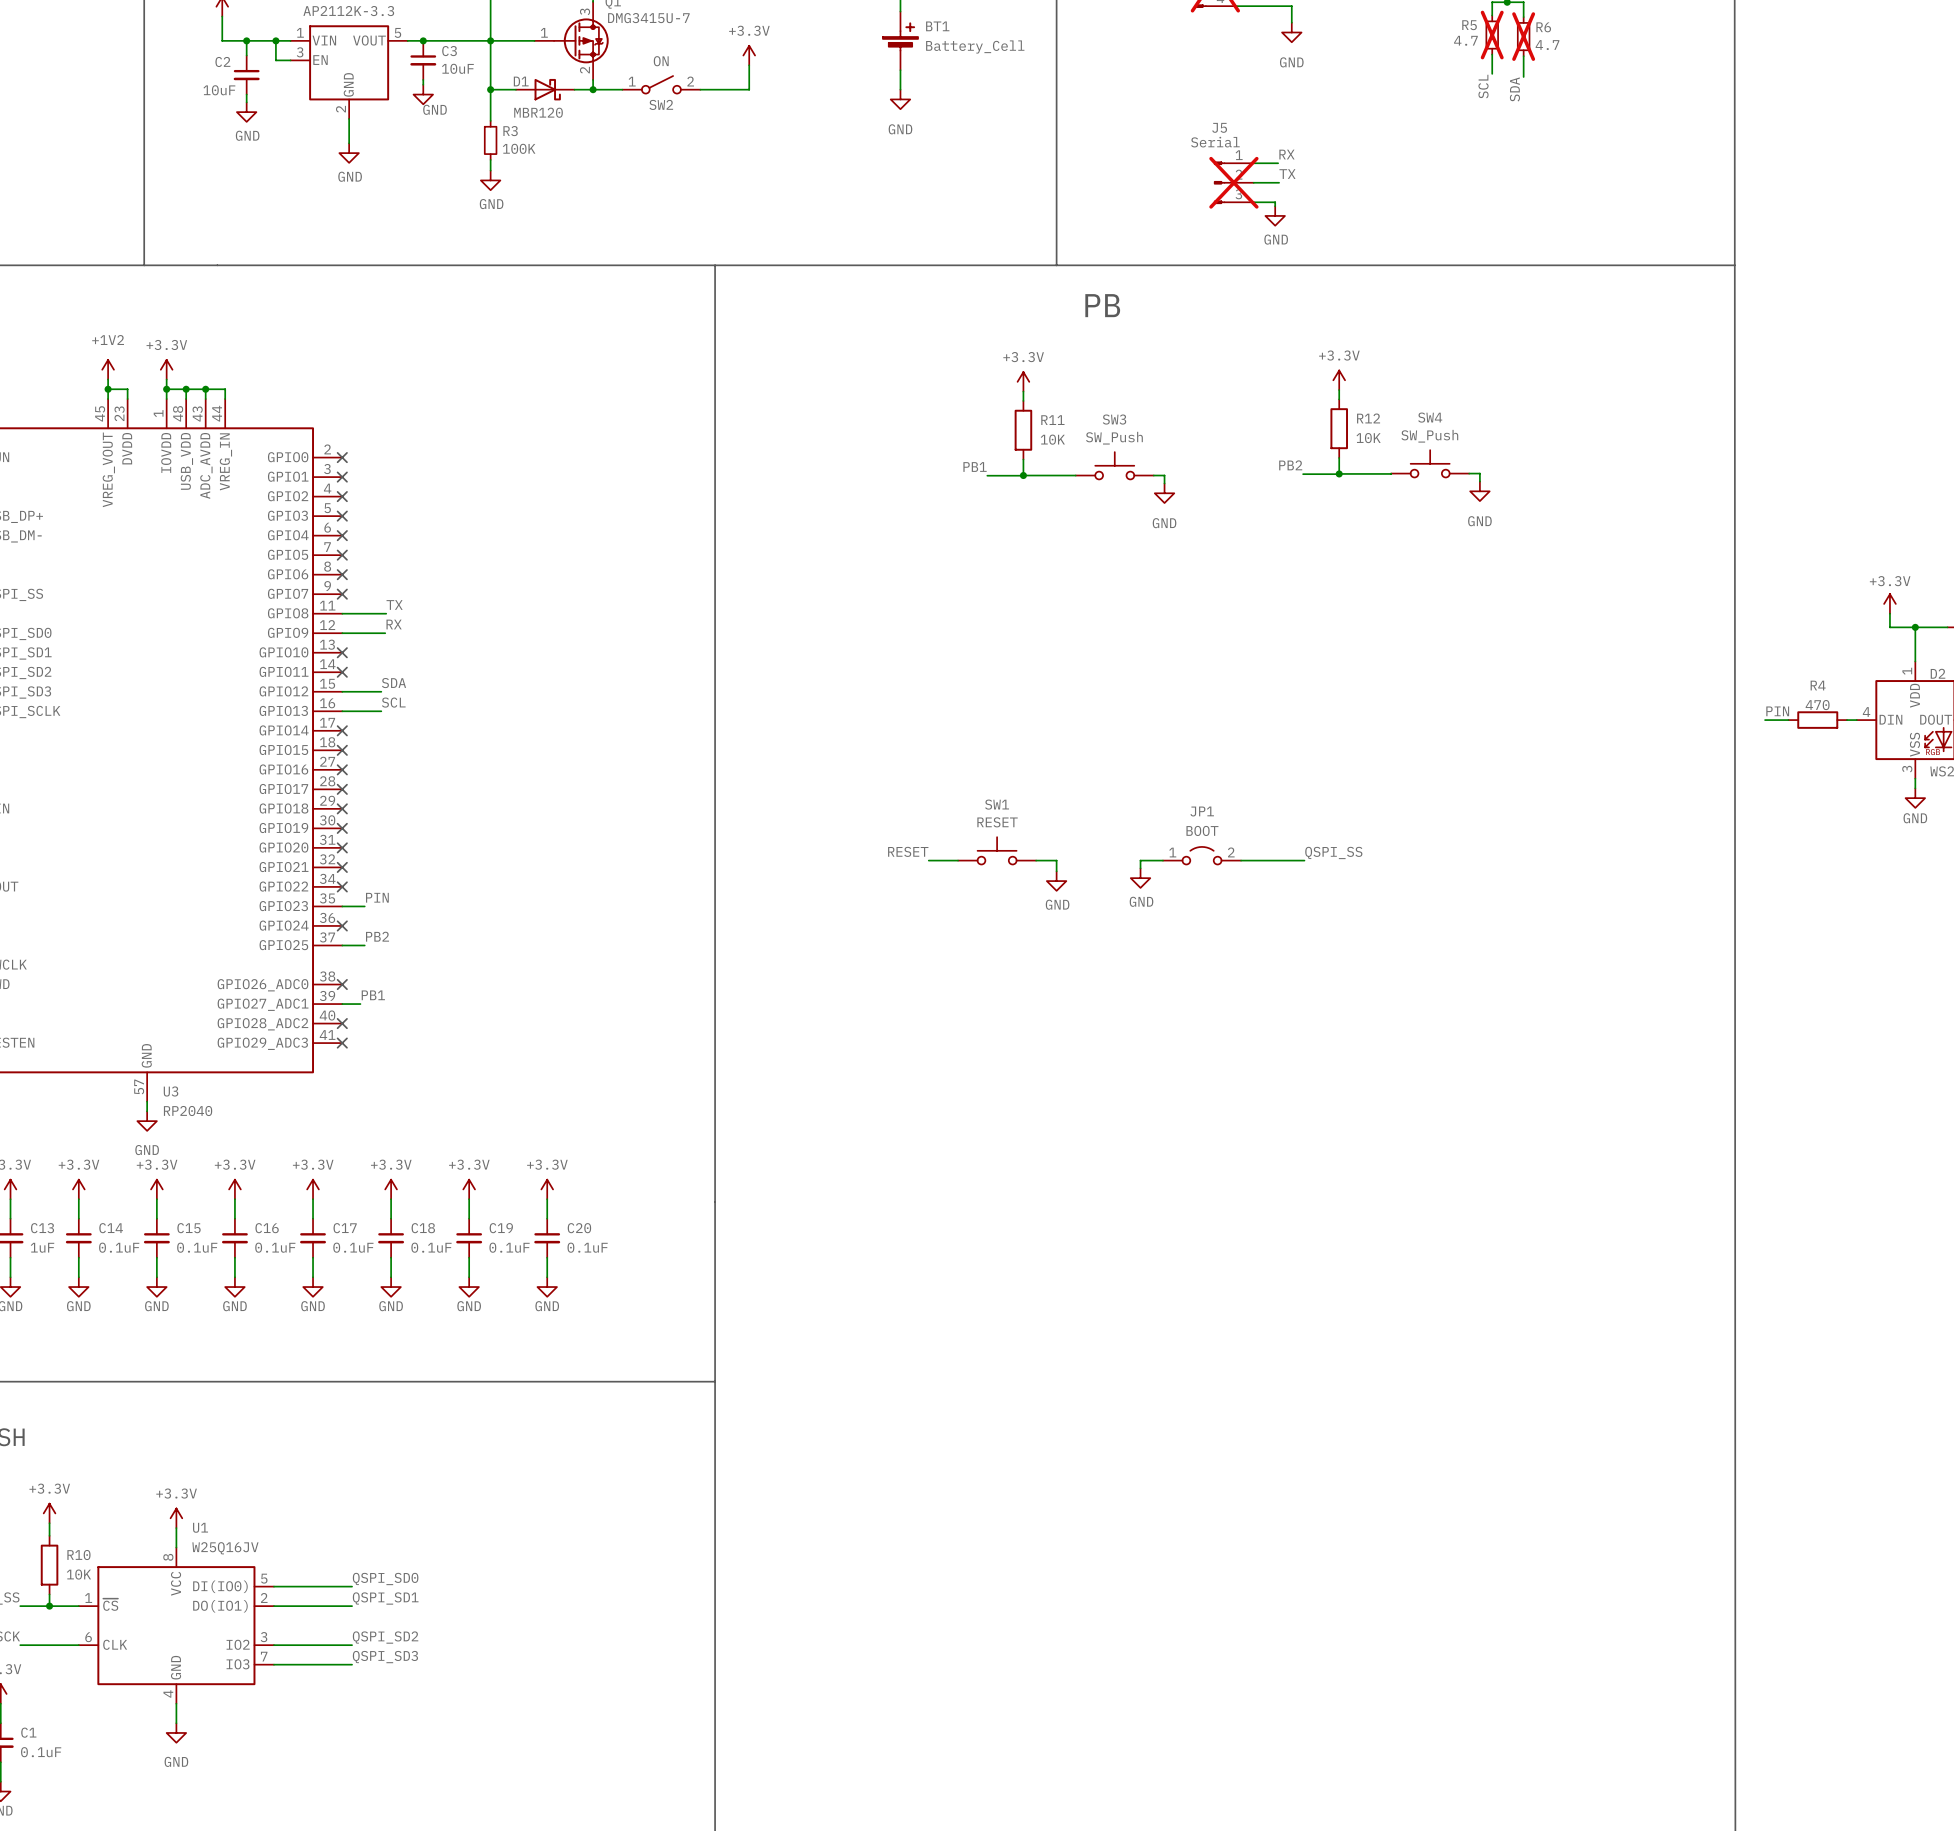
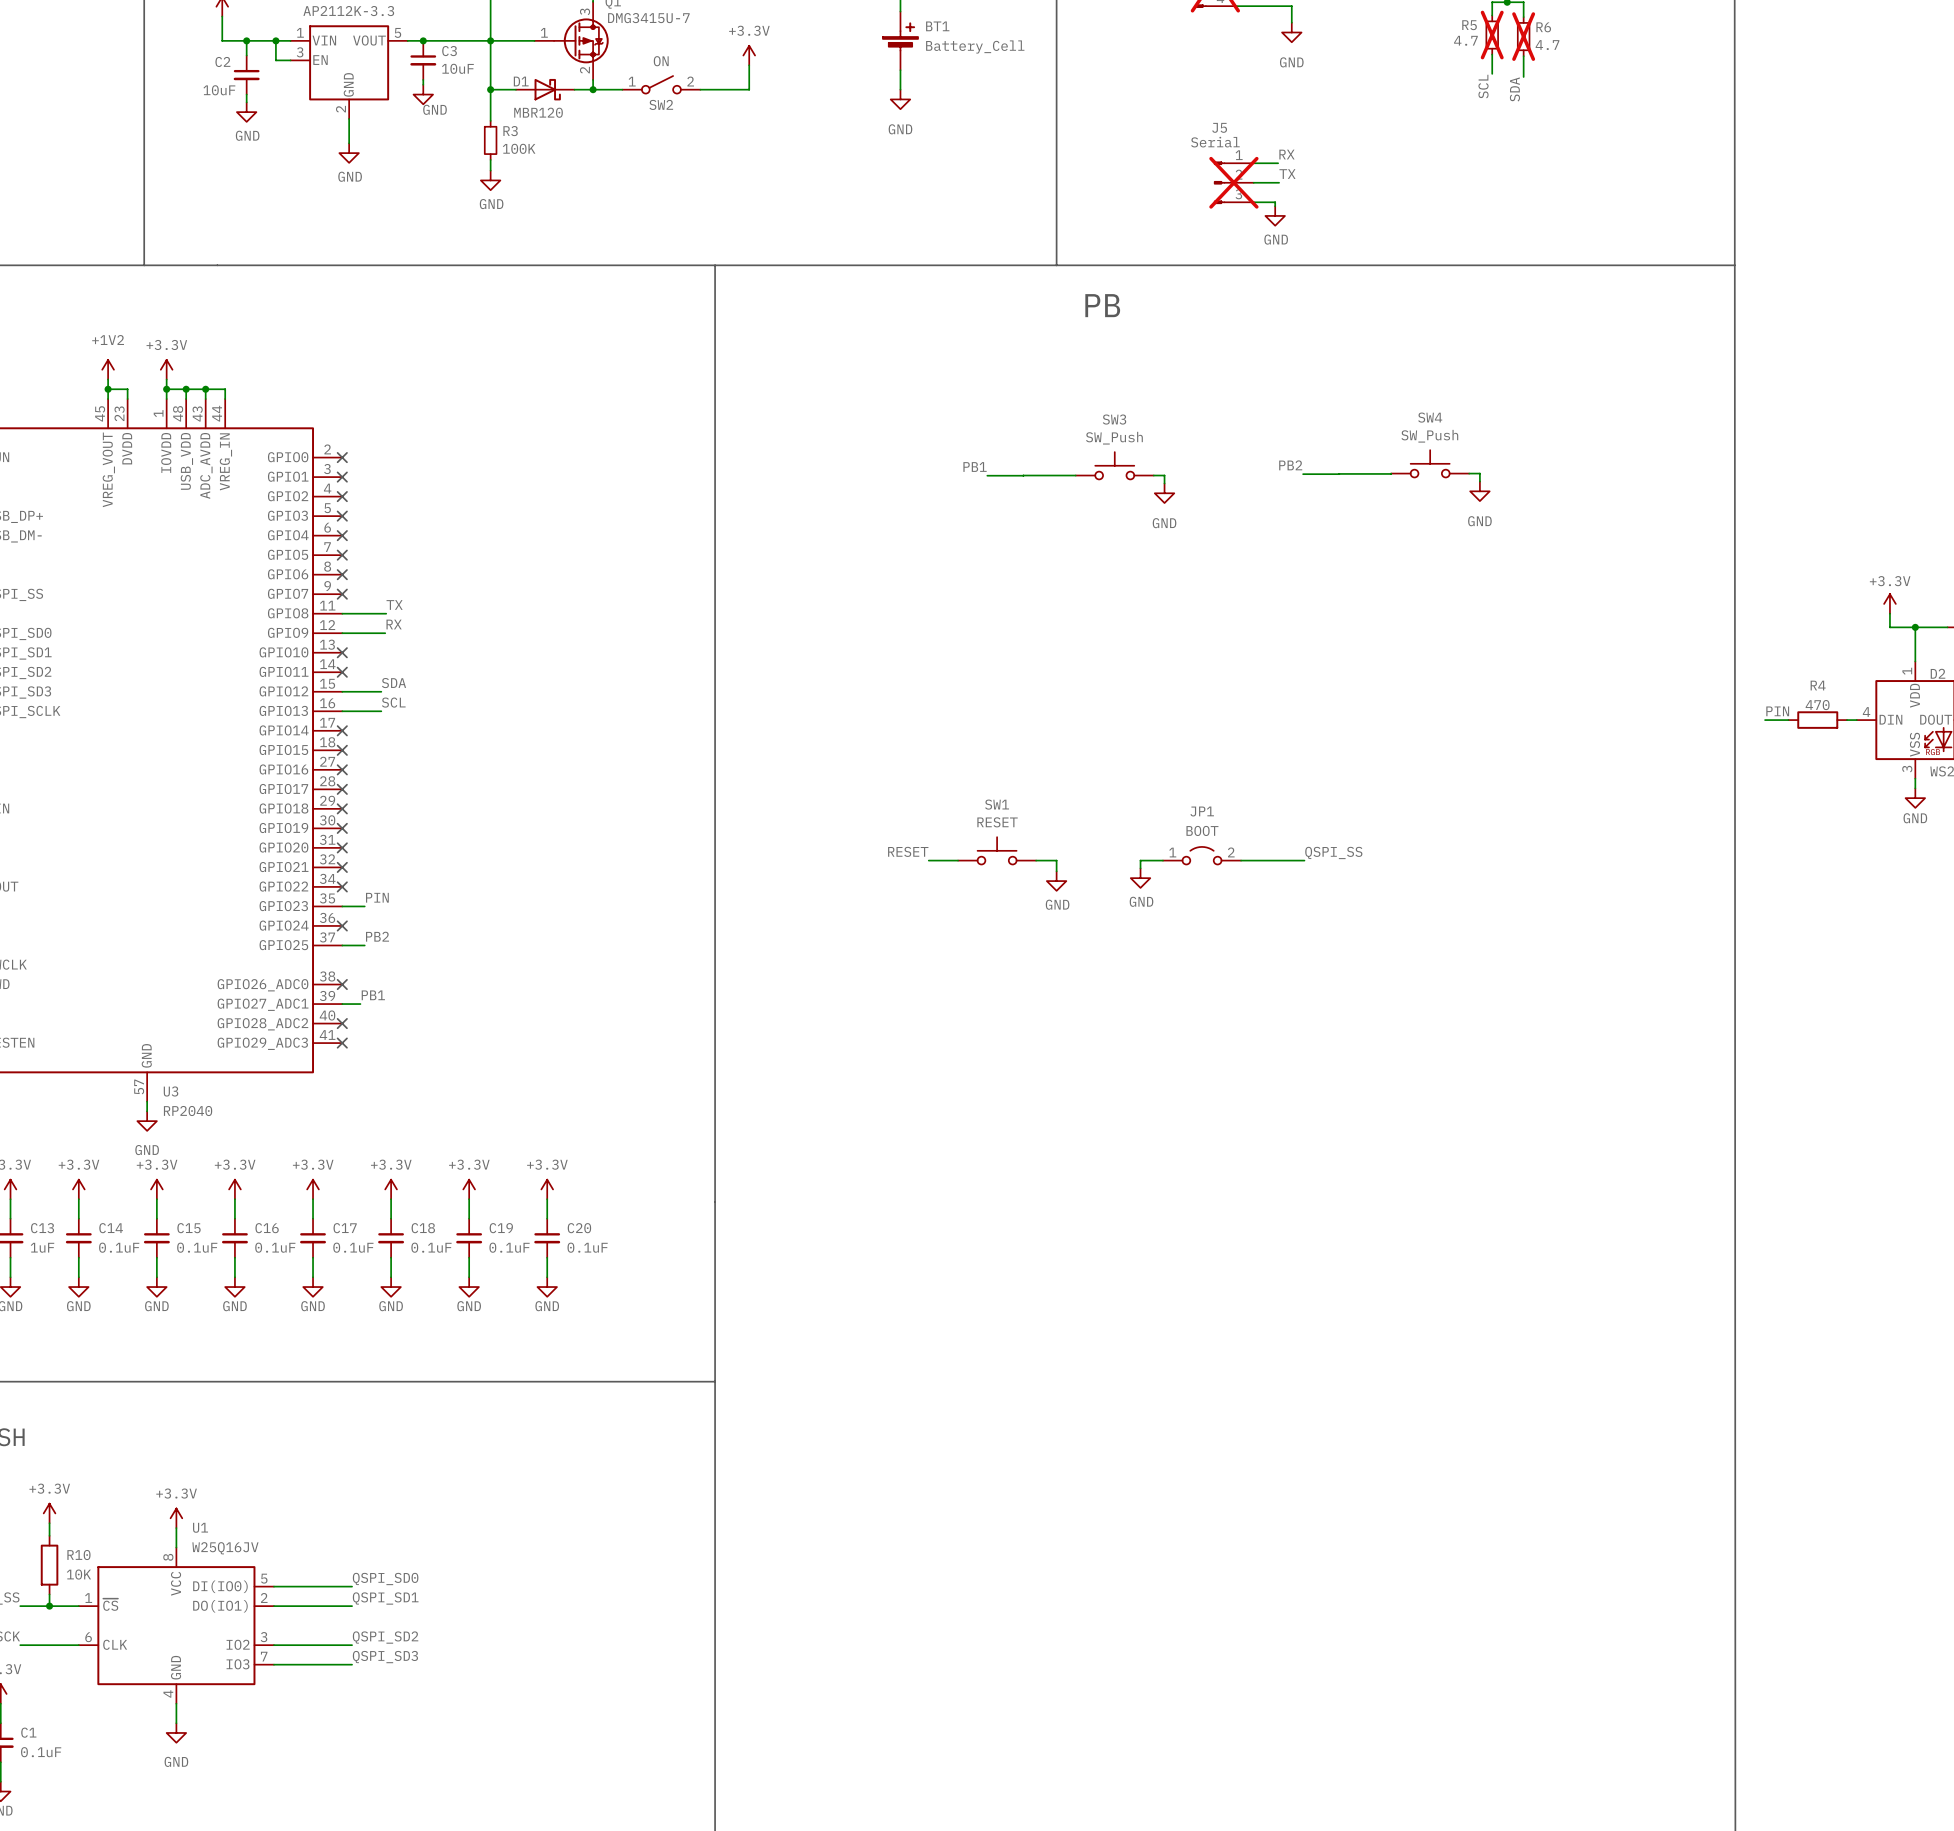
power symbol: +3.3V (1339, 380) -> none
power symbol: +3.3V (1023, 381) -> none
wire: (1339, 390) (1339, 399) -> none
wire: (1023, 391) (1023, 400) -> none
R12: 10K (1339, 428) -> none
R11: 10K (1023, 430) -> none
wire: (1339, 457) (1339, 473) -> none
wire: (1023, 459) (1023, 475) -> none
junction: (1339, 473) -> none
junction: (1023, 475) -> none

